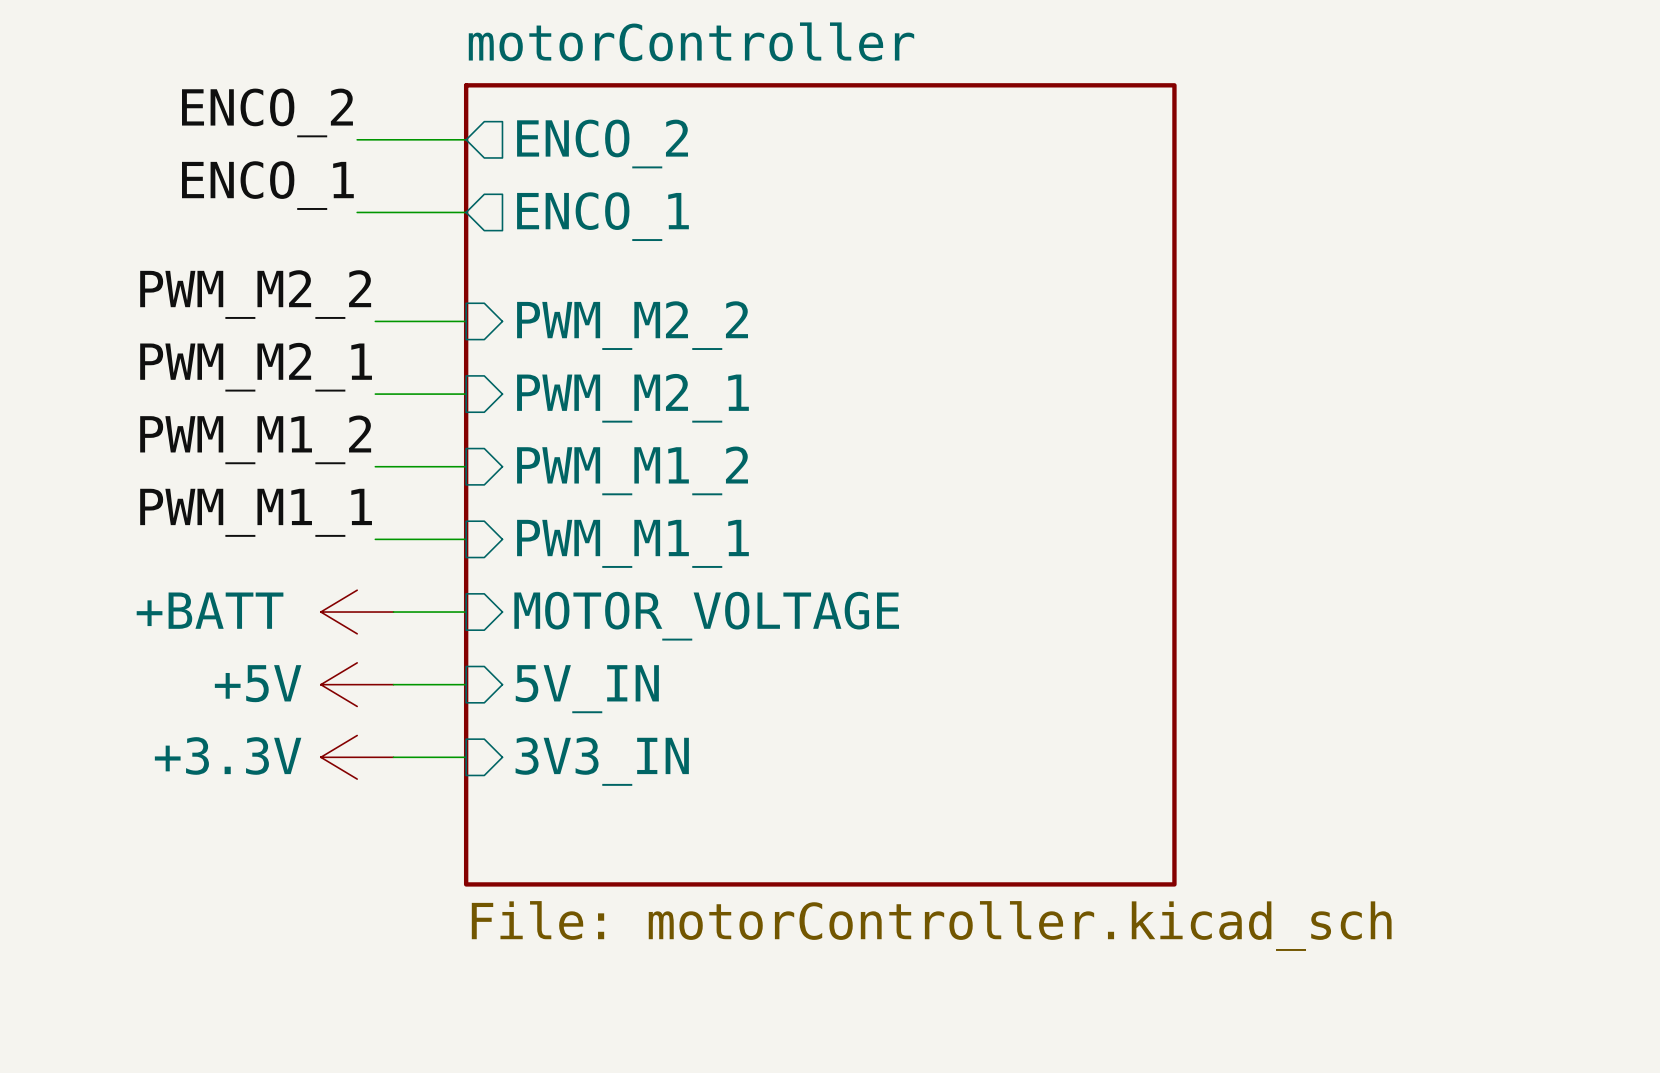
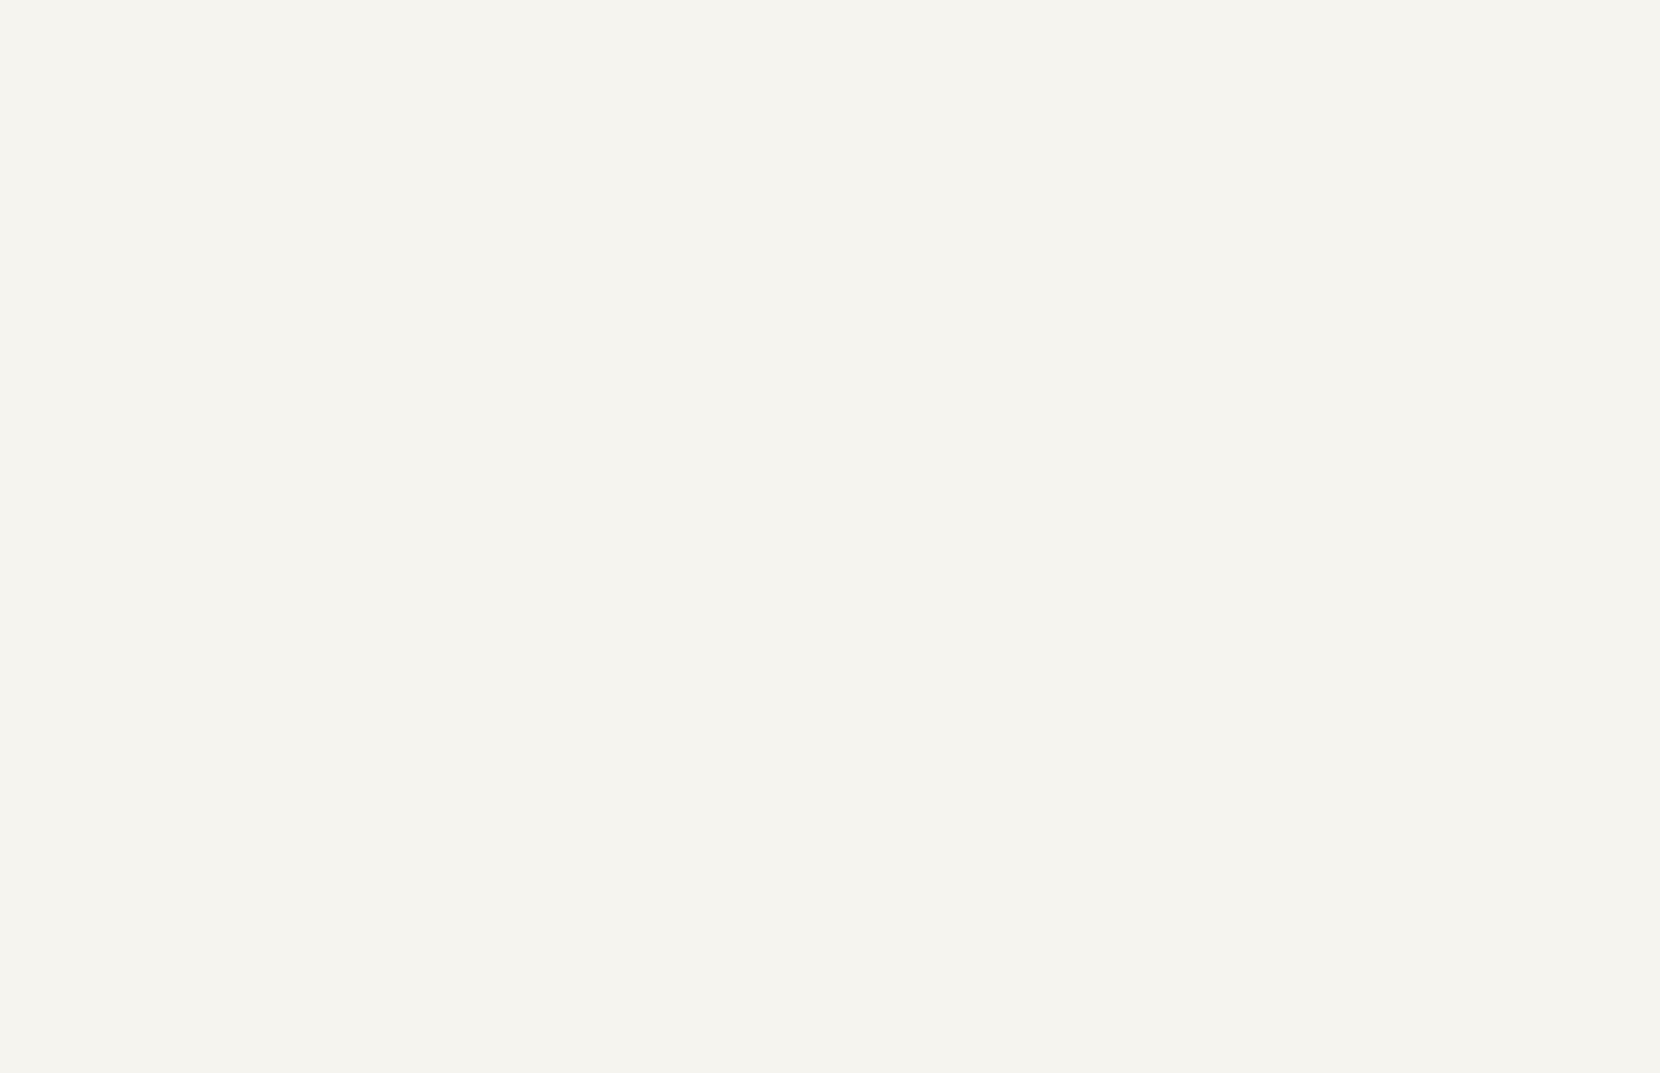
label: ENCO_2 (267, 112) -> none
wire: (357, 139) (466, 139) -> none
sheet pin: ENCO_2 (602, 144) -> none
label: ENCO_1 (267, 185) -> none
wire: (357, 212) (466, 212) -> none
sheet pin: ENCO_1 (602, 216) -> none
label: PWM_M2_2 (255, 294) -> none
wire: (375, 321) (466, 321) -> none
sheet pin: PWM_M2_2 (632, 325) -> none
label: PWM_M2_1 (256, 367) -> none
wire: (375, 394) (466, 394) -> none
sheet pin: PWM_M2_1 (632, 398) -> none
label: PWM_M1_2 (255, 439) -> none
wire: (375, 466) (466, 466) -> none
sheet pin: PWM_M1_2 (632, 470) -> none
sheet motorController: File: motorController.kicad_sch (820, 484) -> none
label: PWM_M1_1 (256, 512) -> none
wire: (375, 539) (466, 539) -> none
sheet pin: PWM_M1_1 (632, 543) -> none
power symbol: +BATT (357, 612) -> none
wire: (393, 612) (466, 612) -> none
sheet pin: MOTOR_VOLTAGE (706, 616) -> none
power symbol: +5V (357, 684) -> none
wire: (393, 684) (466, 684) -> none
sheet pin: 5V_IN (587, 689) -> none
power symbol: +3.3V (357, 757) -> none
wire: (393, 757) (466, 757) -> none
sheet pin: 3V3_IN (602, 761) -> none

